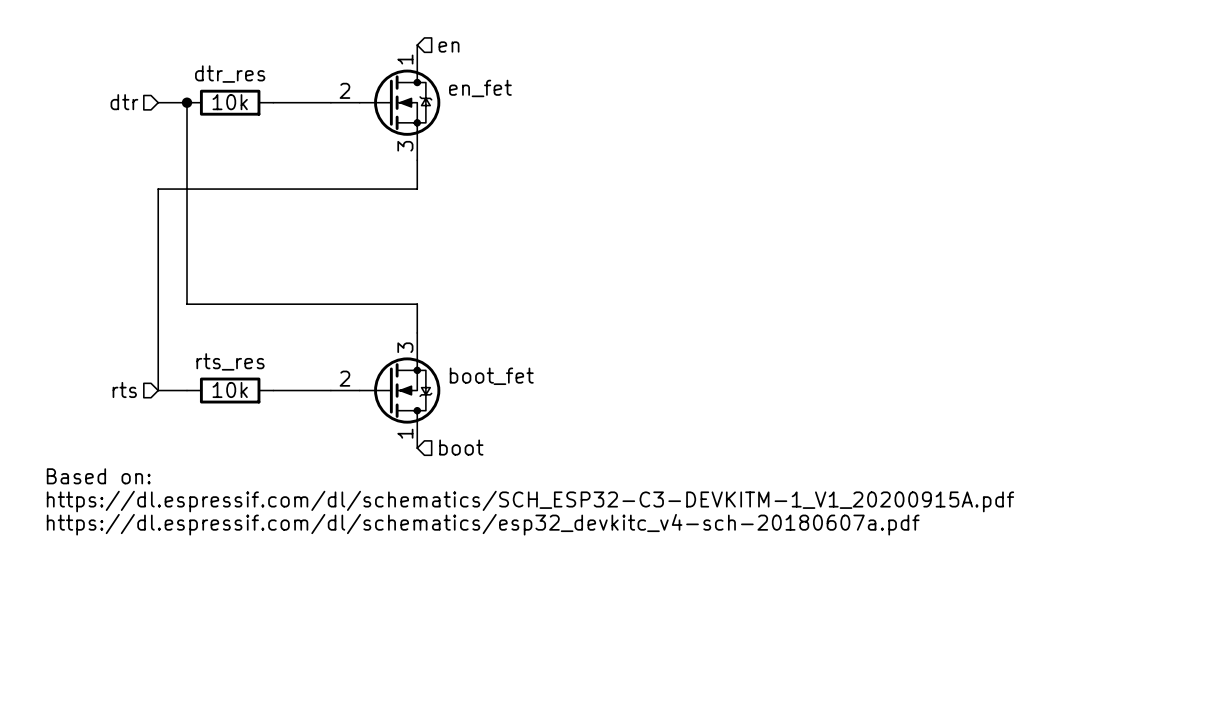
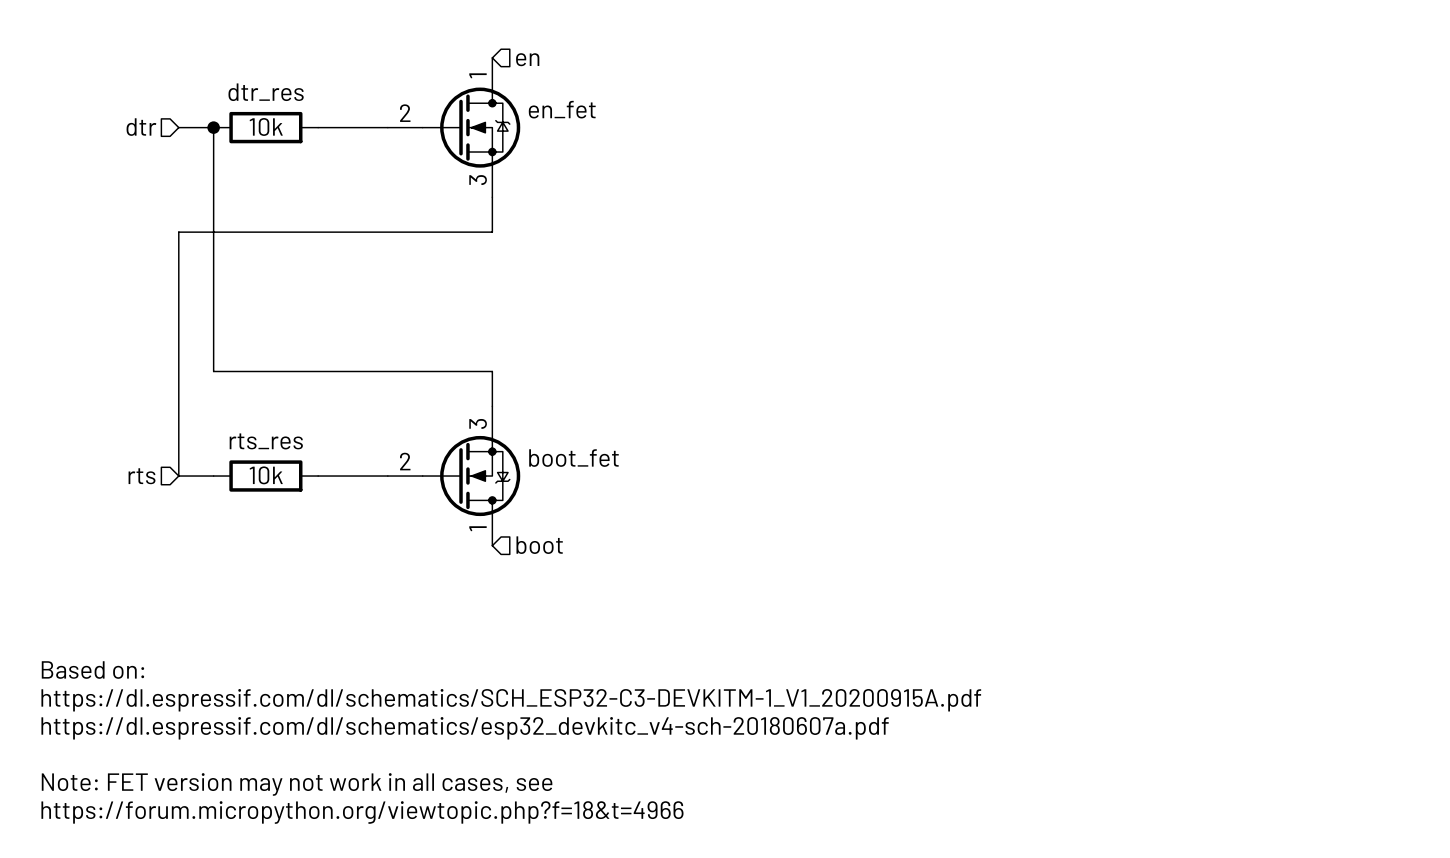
text position: Based on: (98, 476) -> Based on: (92, 670)
text position: https://dl.espressif.com/dl/schematics/SCH_ESP32-C3-DEVKITM-1_V1_20200915A.pdf (530, 501) -> https://dl.espressif.com/dl/schematics/SCH_ESP32-C3-DEVKITM-1_V1_20200915A.pdf (511, 700)
text position: https://dl.espressif.com/dl/schematics/esp32_devkitc_v4-sch-20180607a.pdf (483, 524) -> https://dl.espressif.com/dl/schematics/esp32_devkitc_v4-sch-20180607a.pdf (465, 728)
text: none -> Note: FET version may not work in all cases, see (297, 784)
text: none -> https://forum.micropython.org/viewtopic.php?f=18&t=4966 (362, 812)

